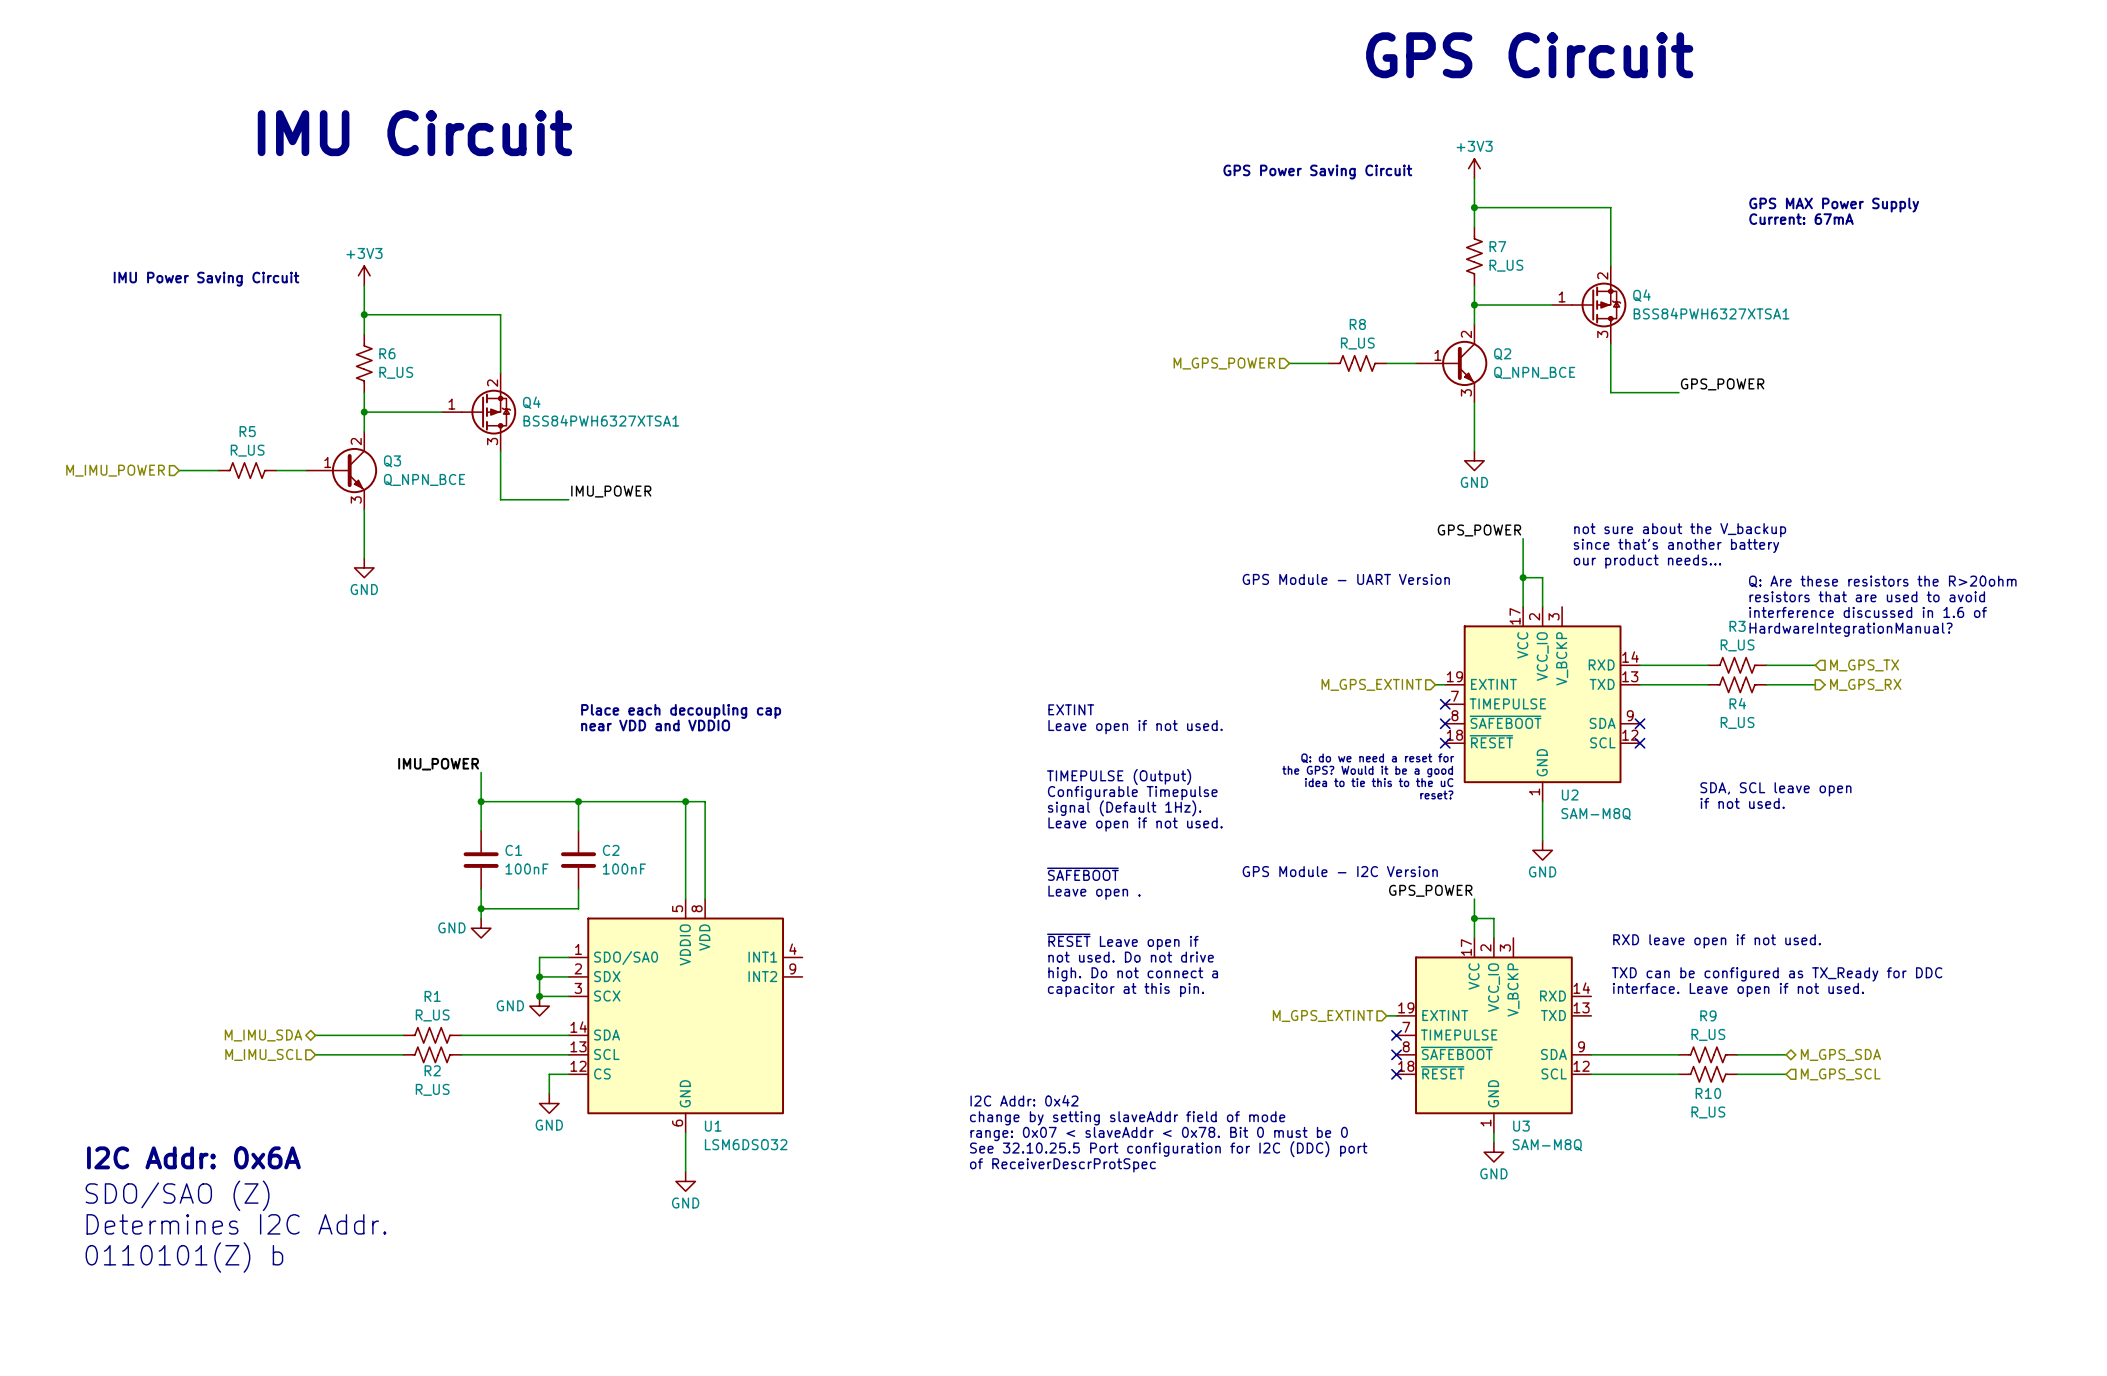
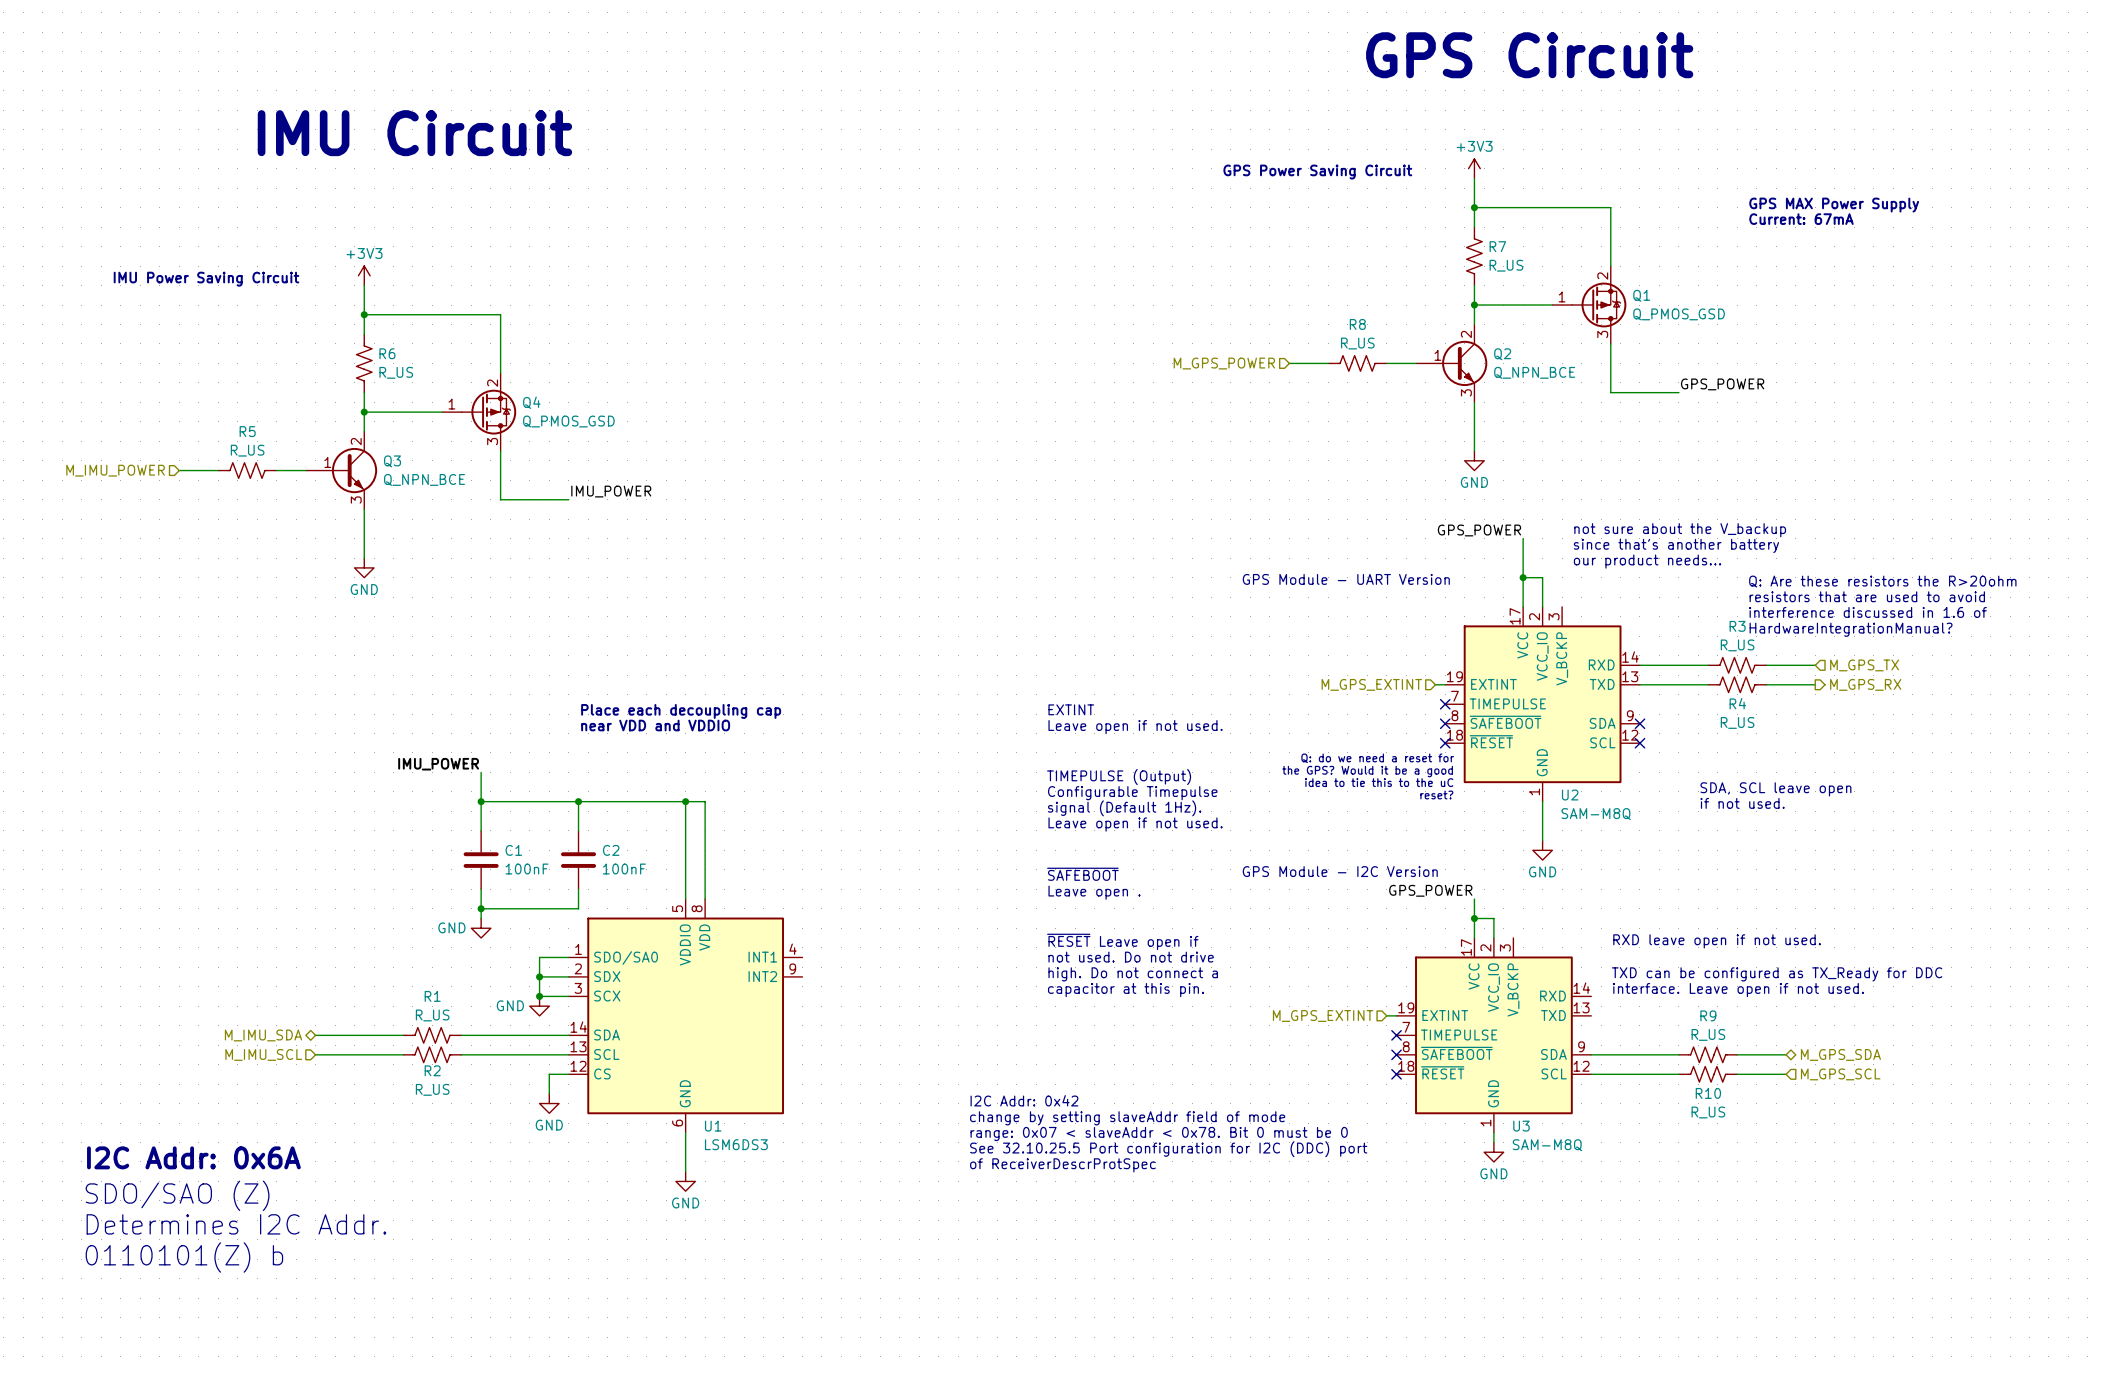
Q4 name: Q4 (1641, 295) -> Q1 (1641, 295)
Q4 value: BSS84PWH6327XTSA1 (1711, 313) -> Q_PMOS_GSD (1679, 314)
Q4 value: BSS84PWH6327XTSA1 (601, 420) -> Q_PMOS_GSD (568, 421)
U1 value: LSM6DSO32 (746, 1144) -> LSM6DS3 (736, 1144)

